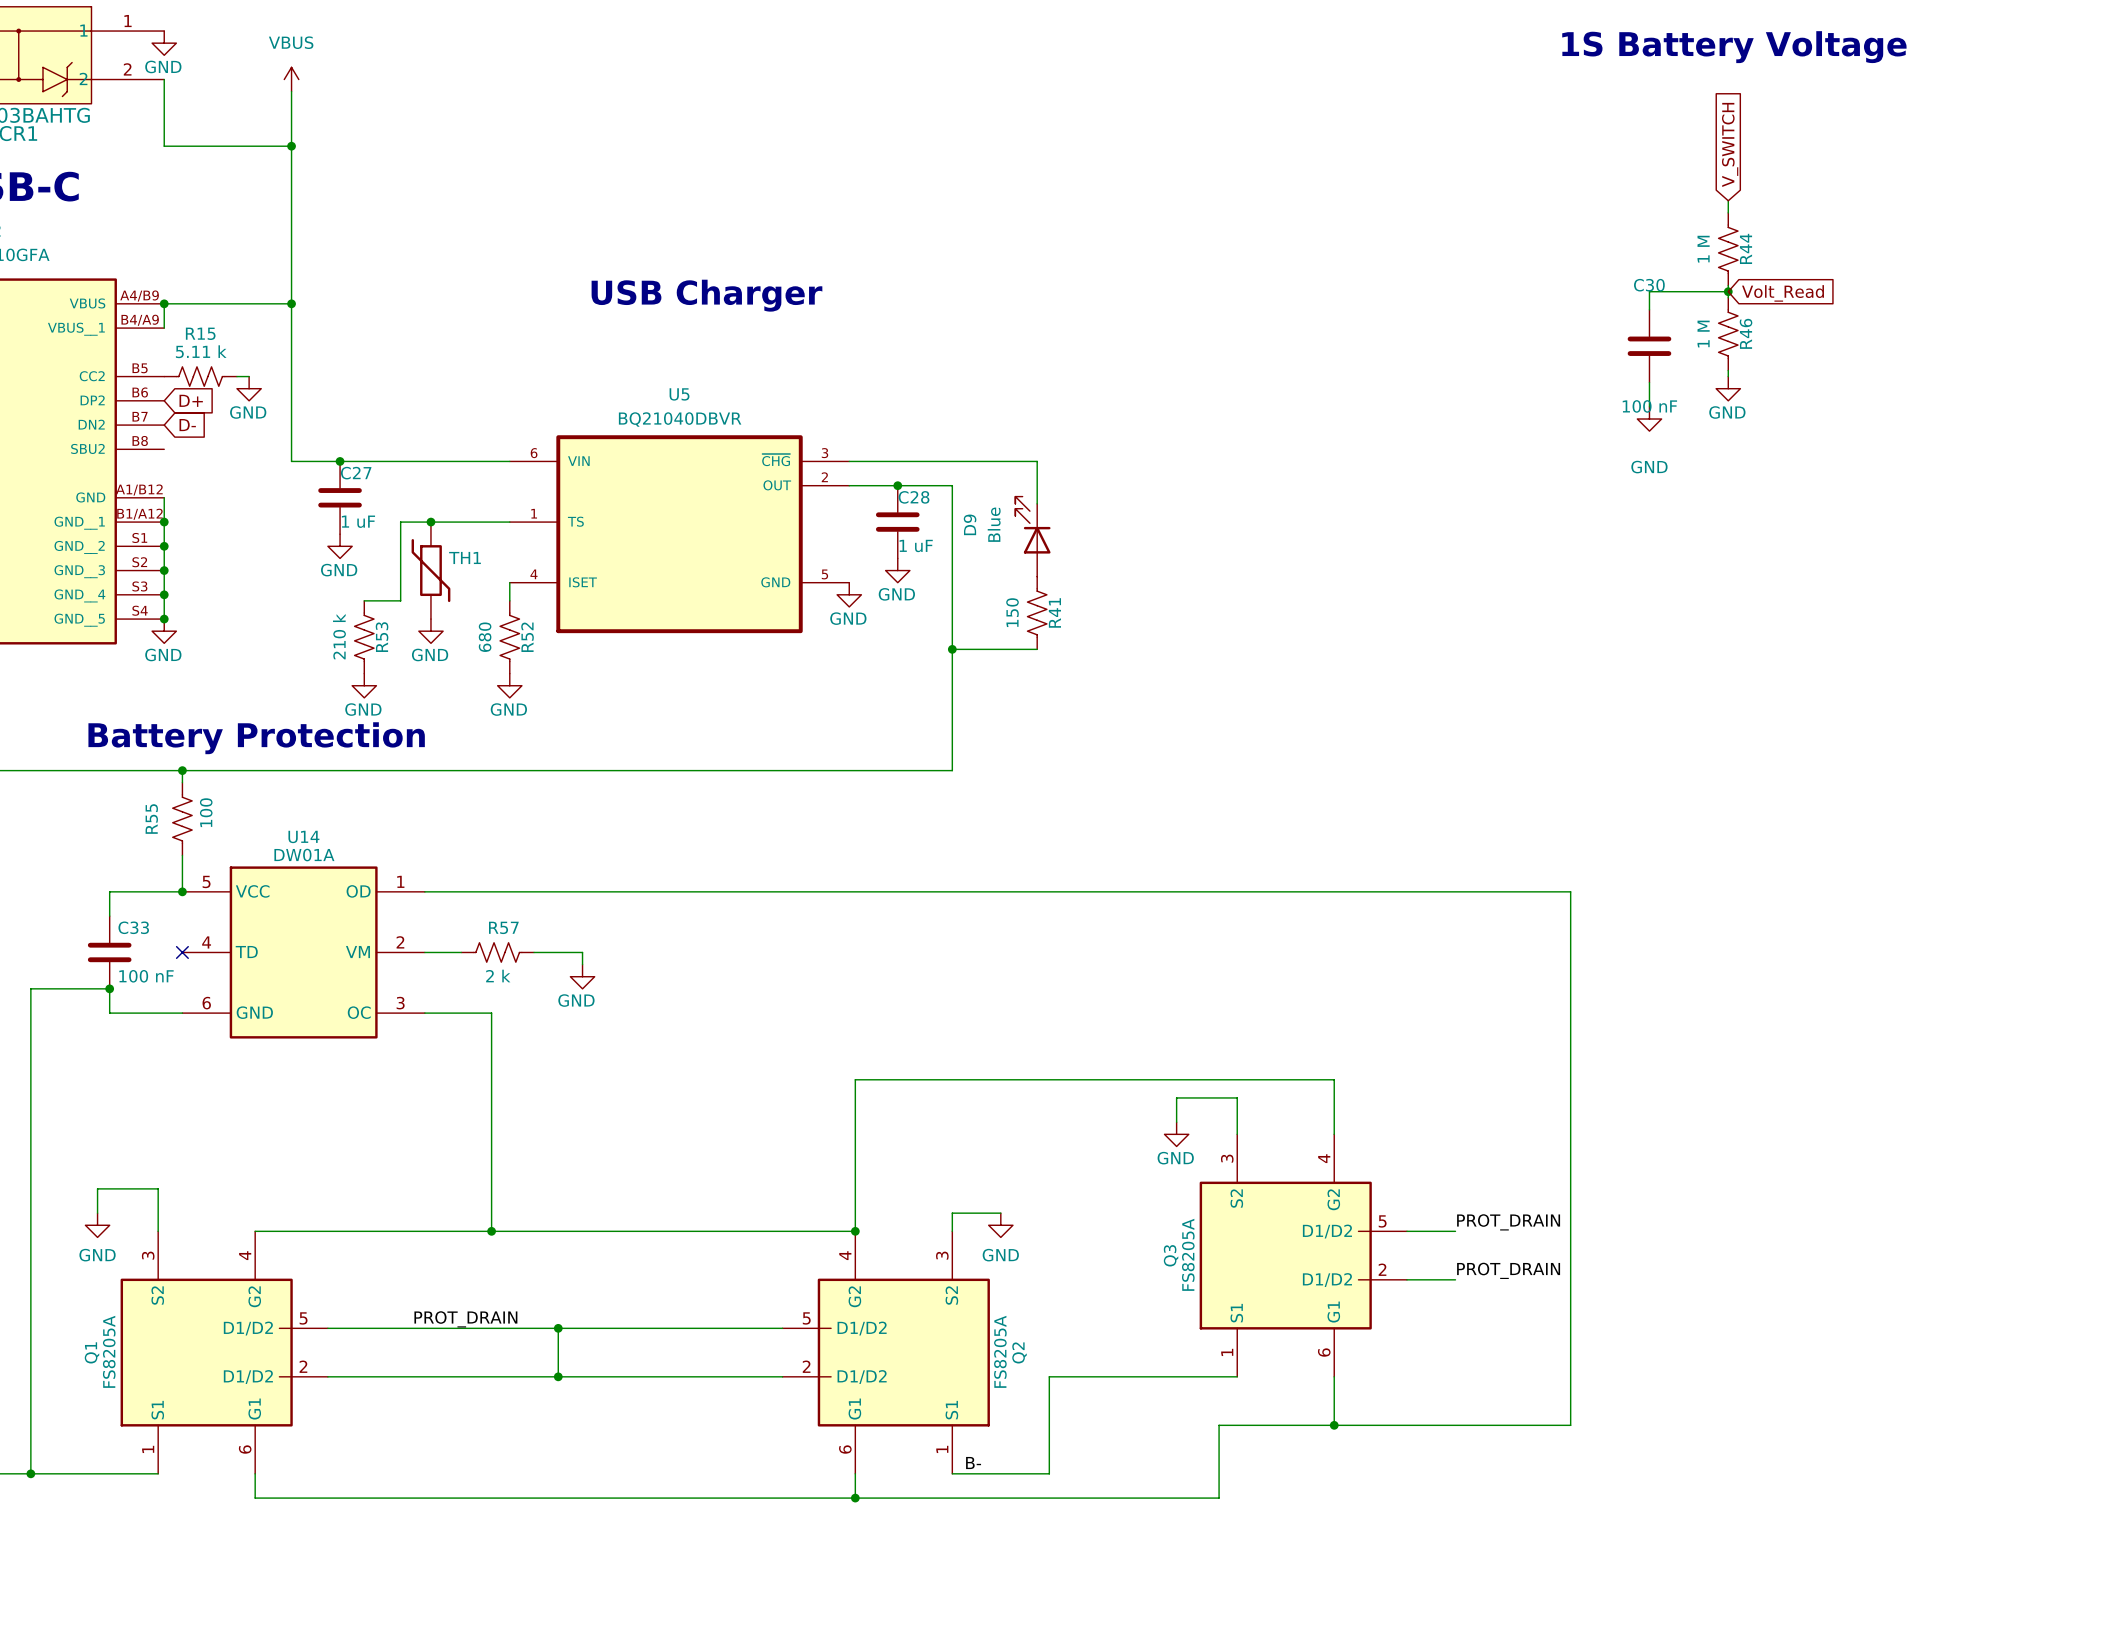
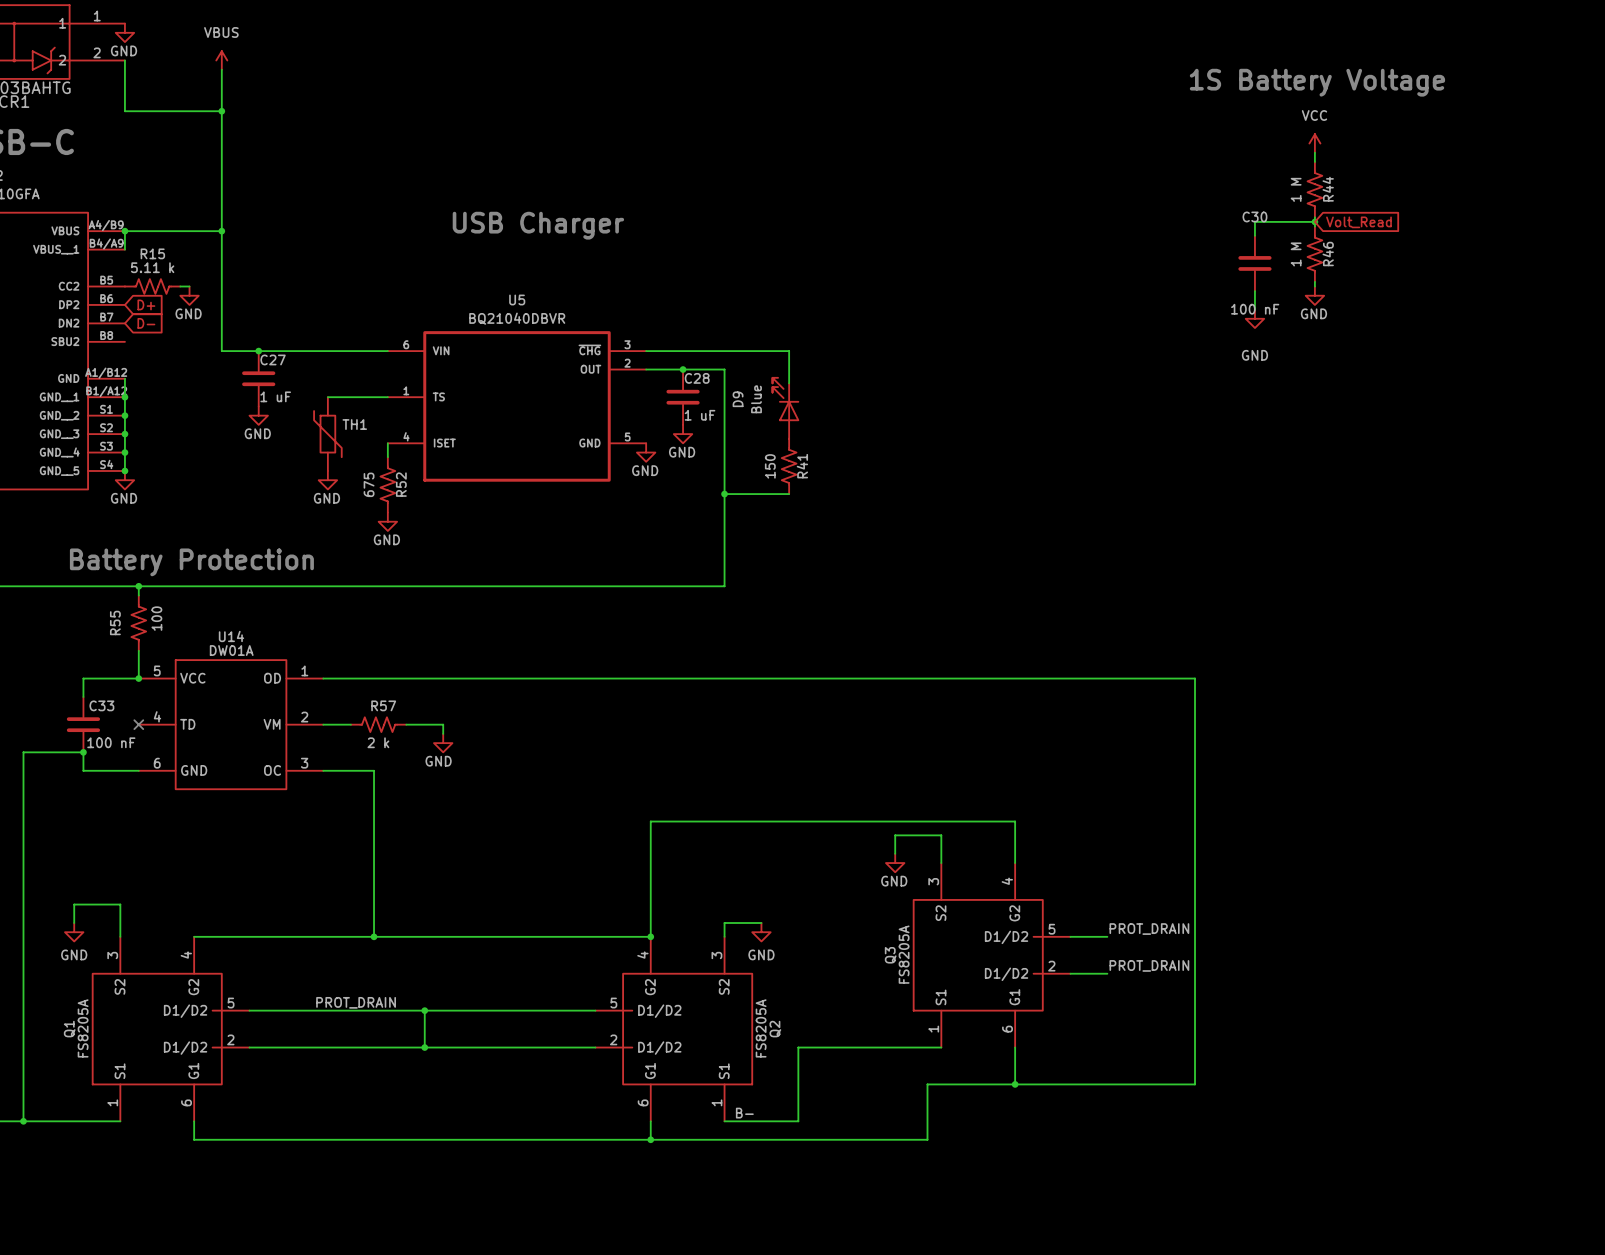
text position: 1S Battery Voltage (1734, 47) -> 1S Battery Voltage (1317, 82)
global label: V_SWITCH (1730, 144) -> none
power symbol: none -> VCC (1314, 143)
wire: (430, 522) (400, 522) (400, 600) (364, 600) -> none
junction: (430, 522) -> none
R53: 210 k (364, 637) -> none
R52 value: 680 (485, 637) -> 675 (369, 484)
power symbol: GND (364, 685) -> none

